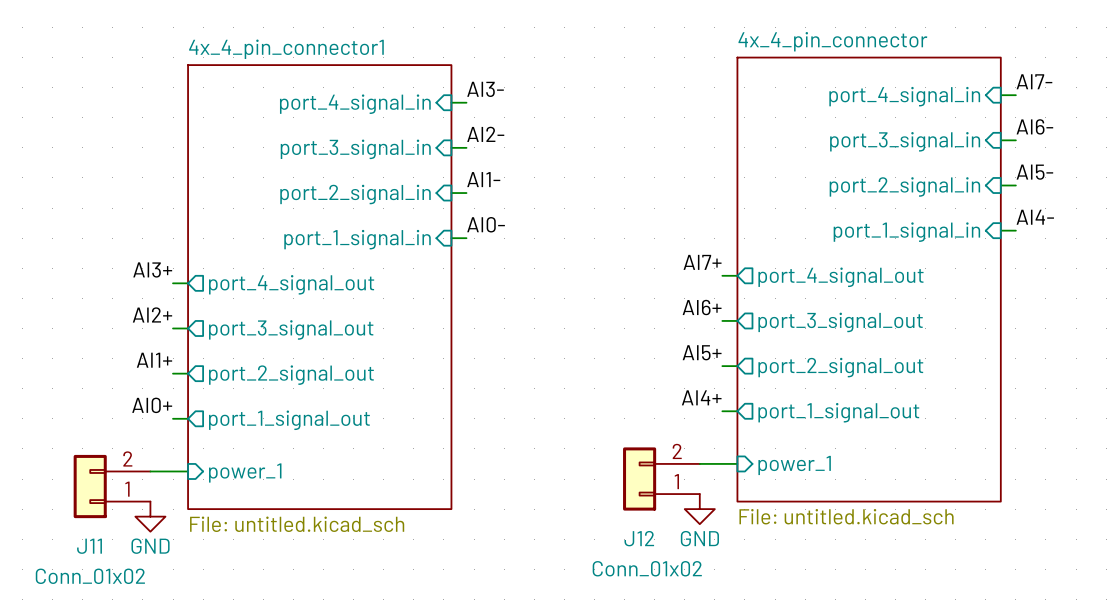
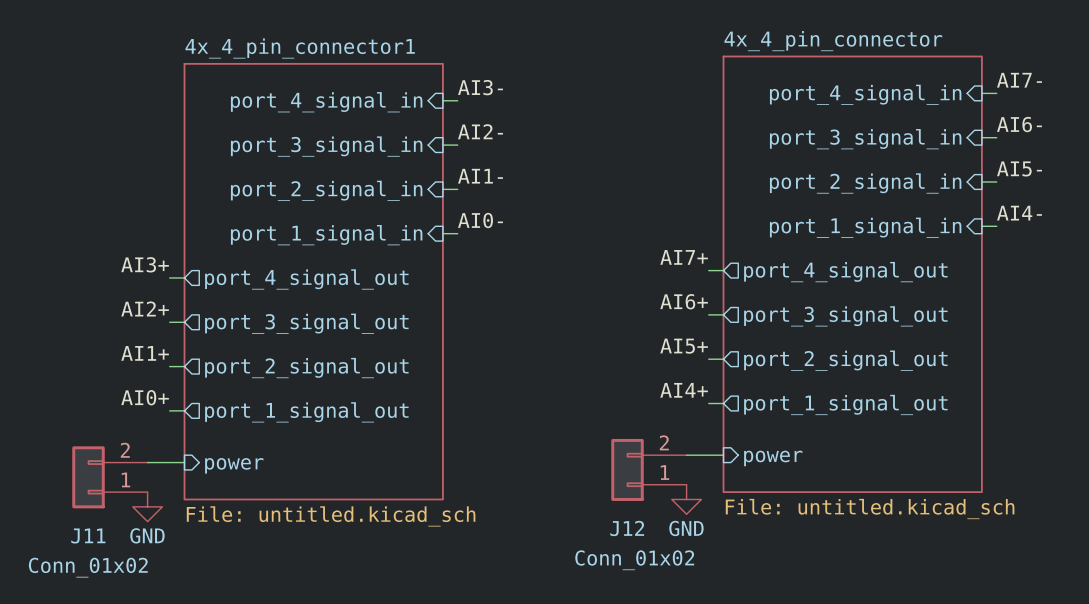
sheet pin: power_1 (794, 465) -> power (773, 458)
sheet pin: power_1 (245, 473) -> power (234, 465)

